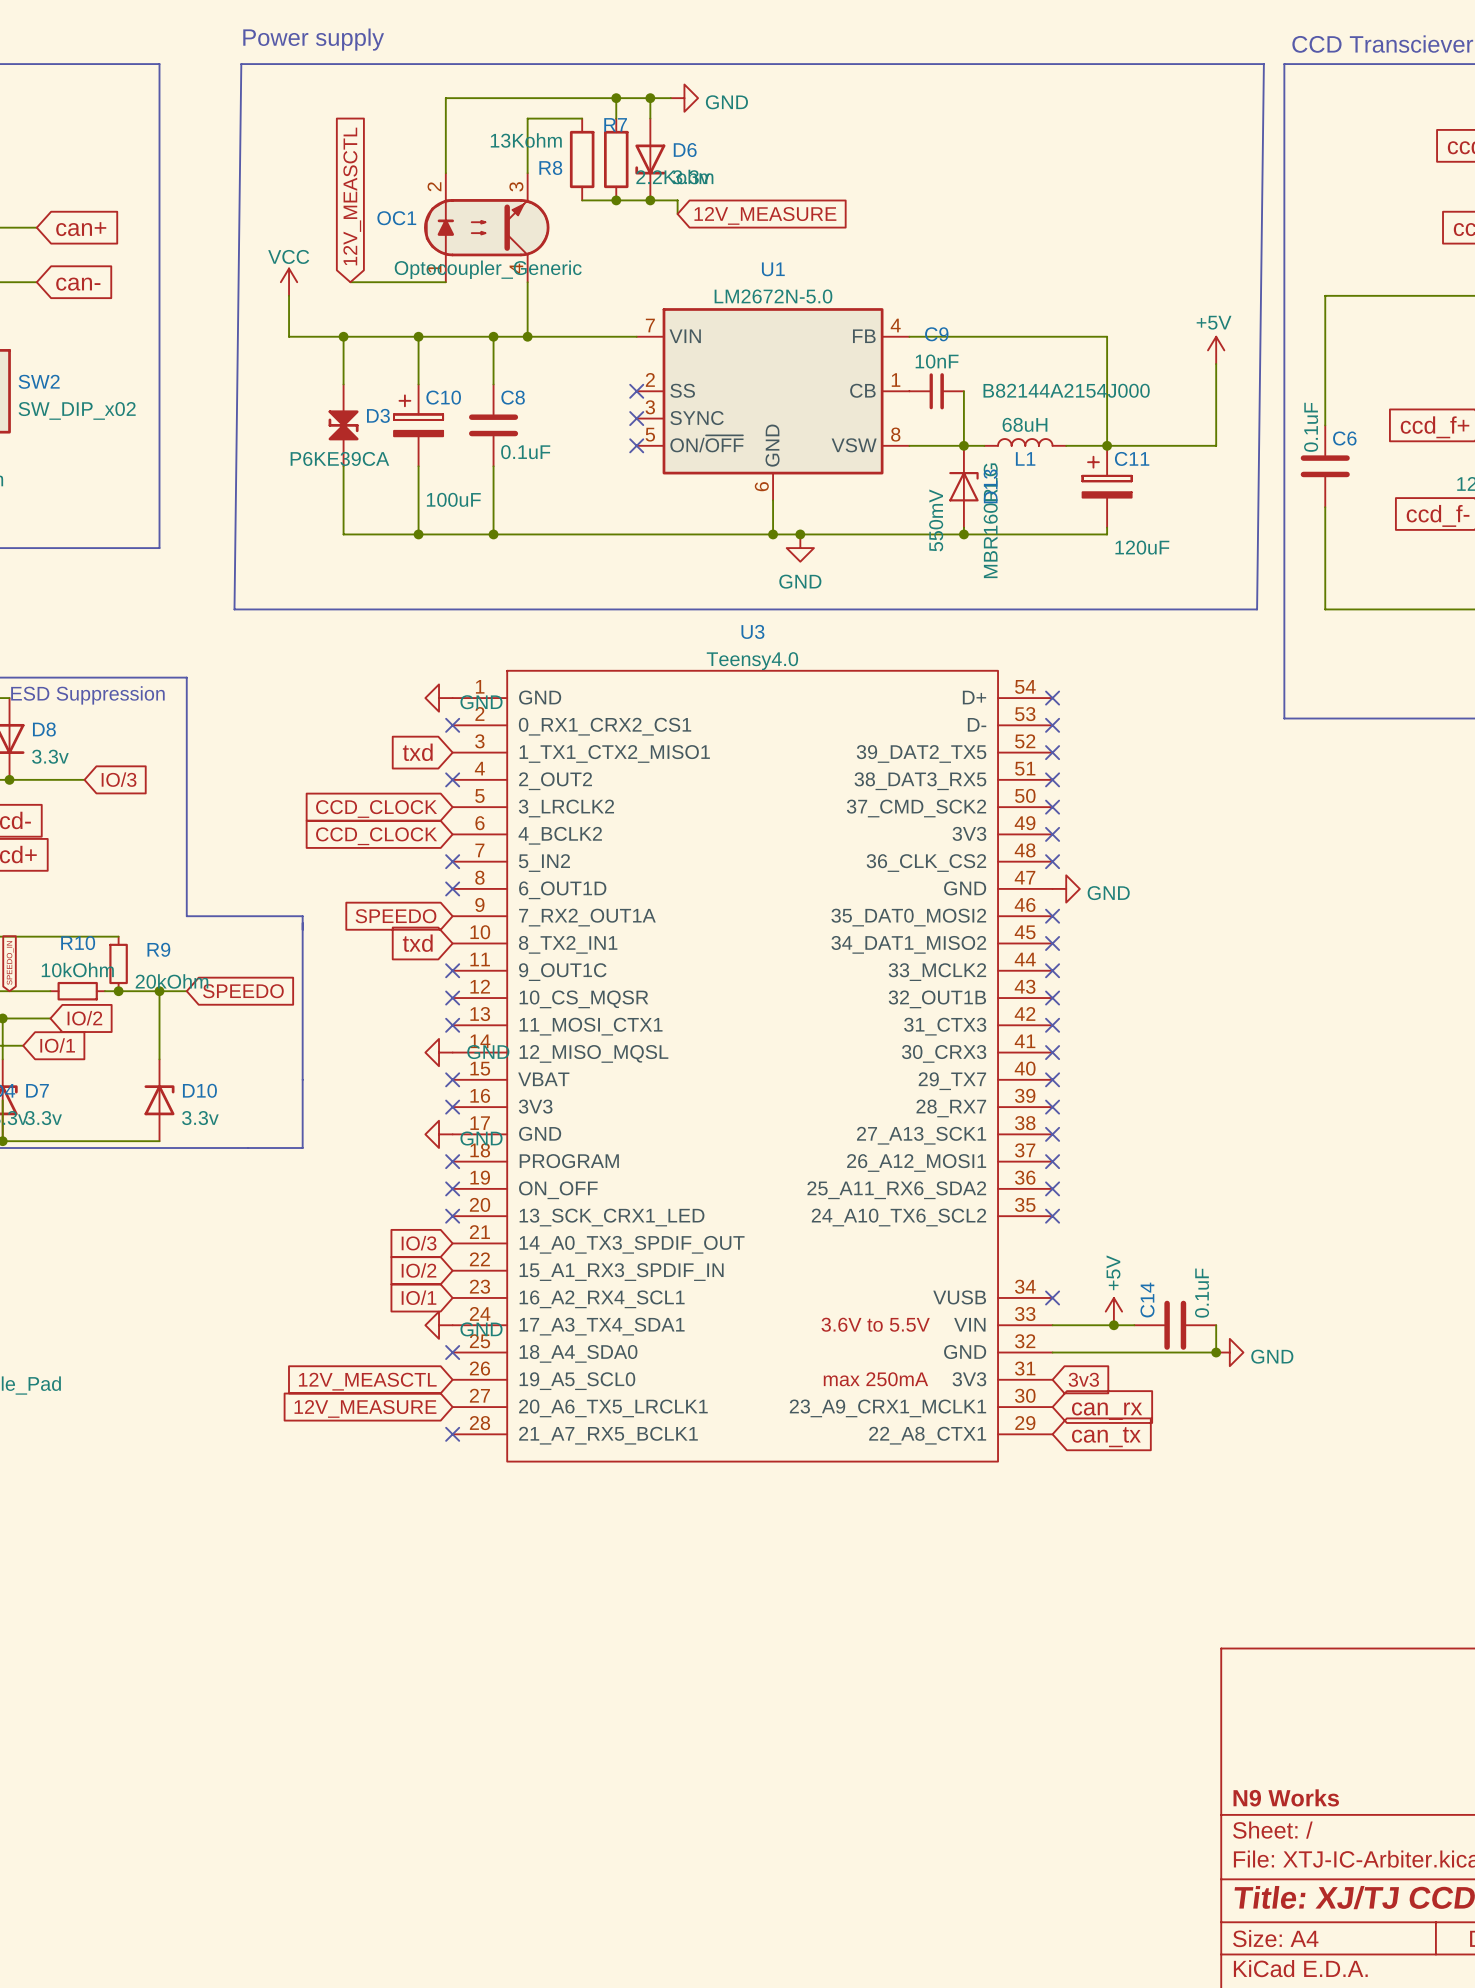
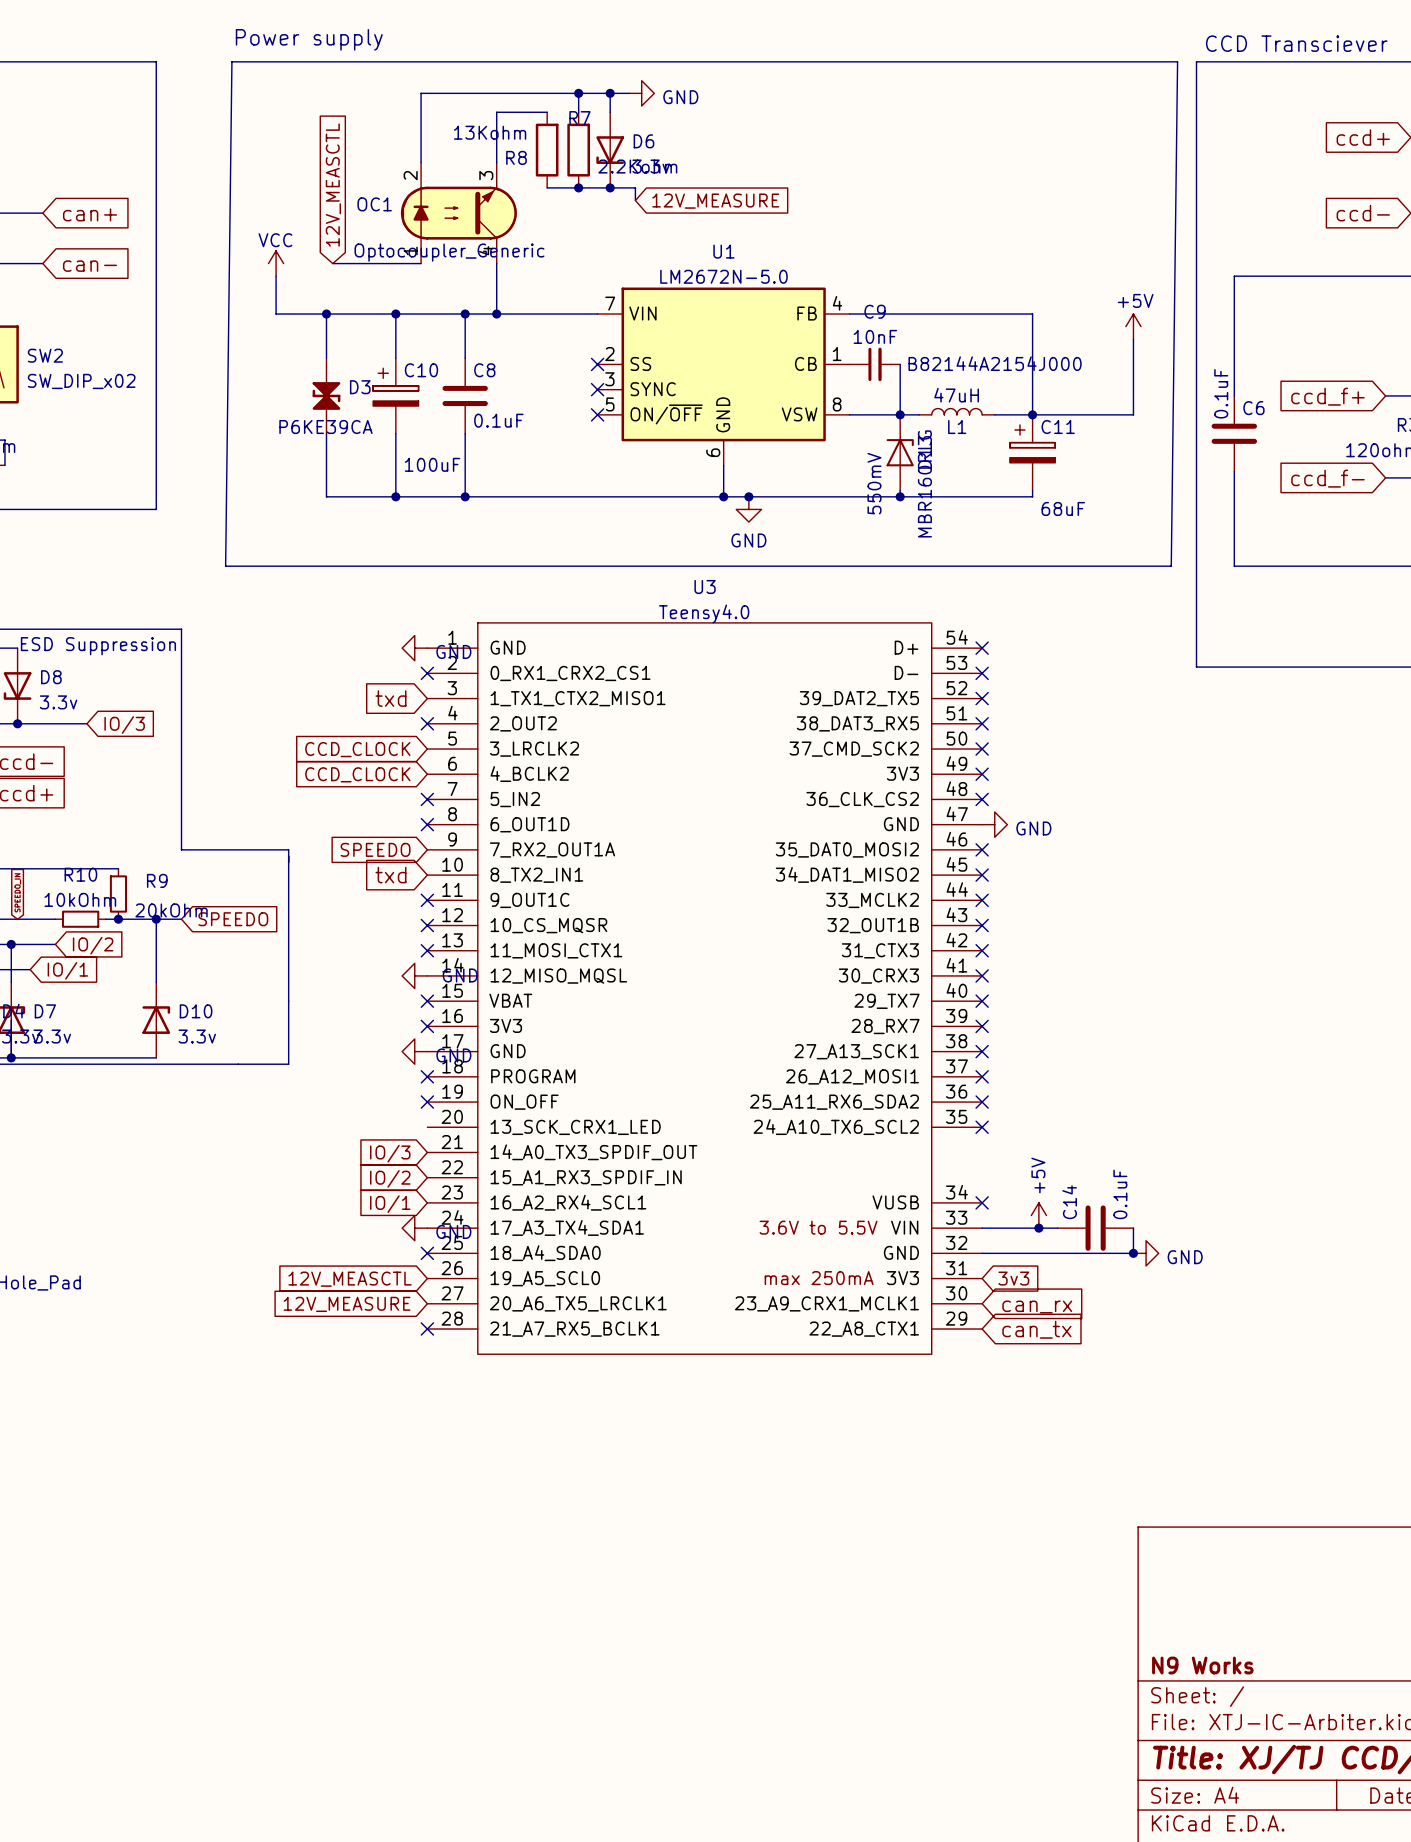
L1 value: 68uH (1024, 424) -> 47uH (956, 395)
C11 value: 120uF (1142, 547) -> 68uF (1063, 508)
no-connect mark: (452, 1216) -> none

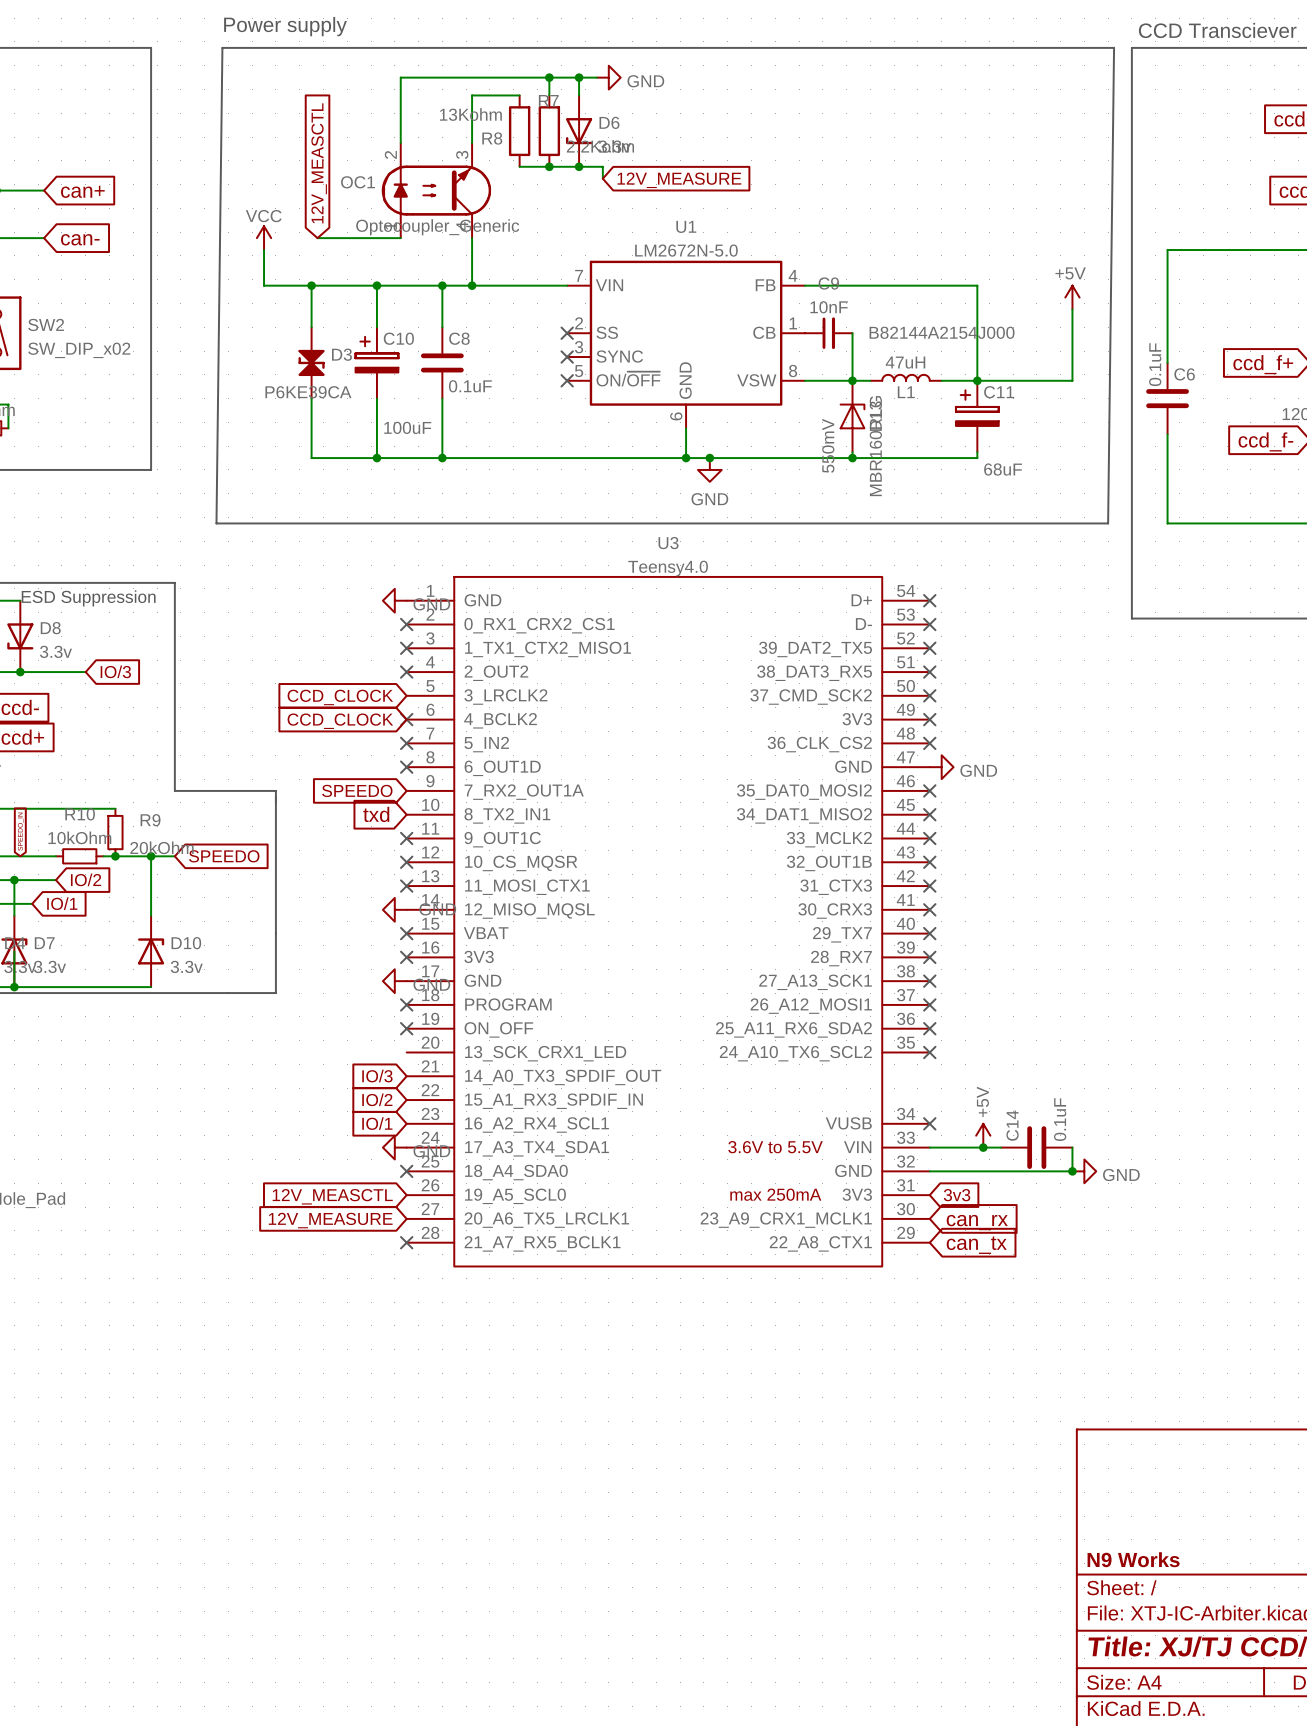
global label: txd (390, 698) -> none
no-connect mark: none -> (406, 648)
no-connect mark: none -> (406, 719)

